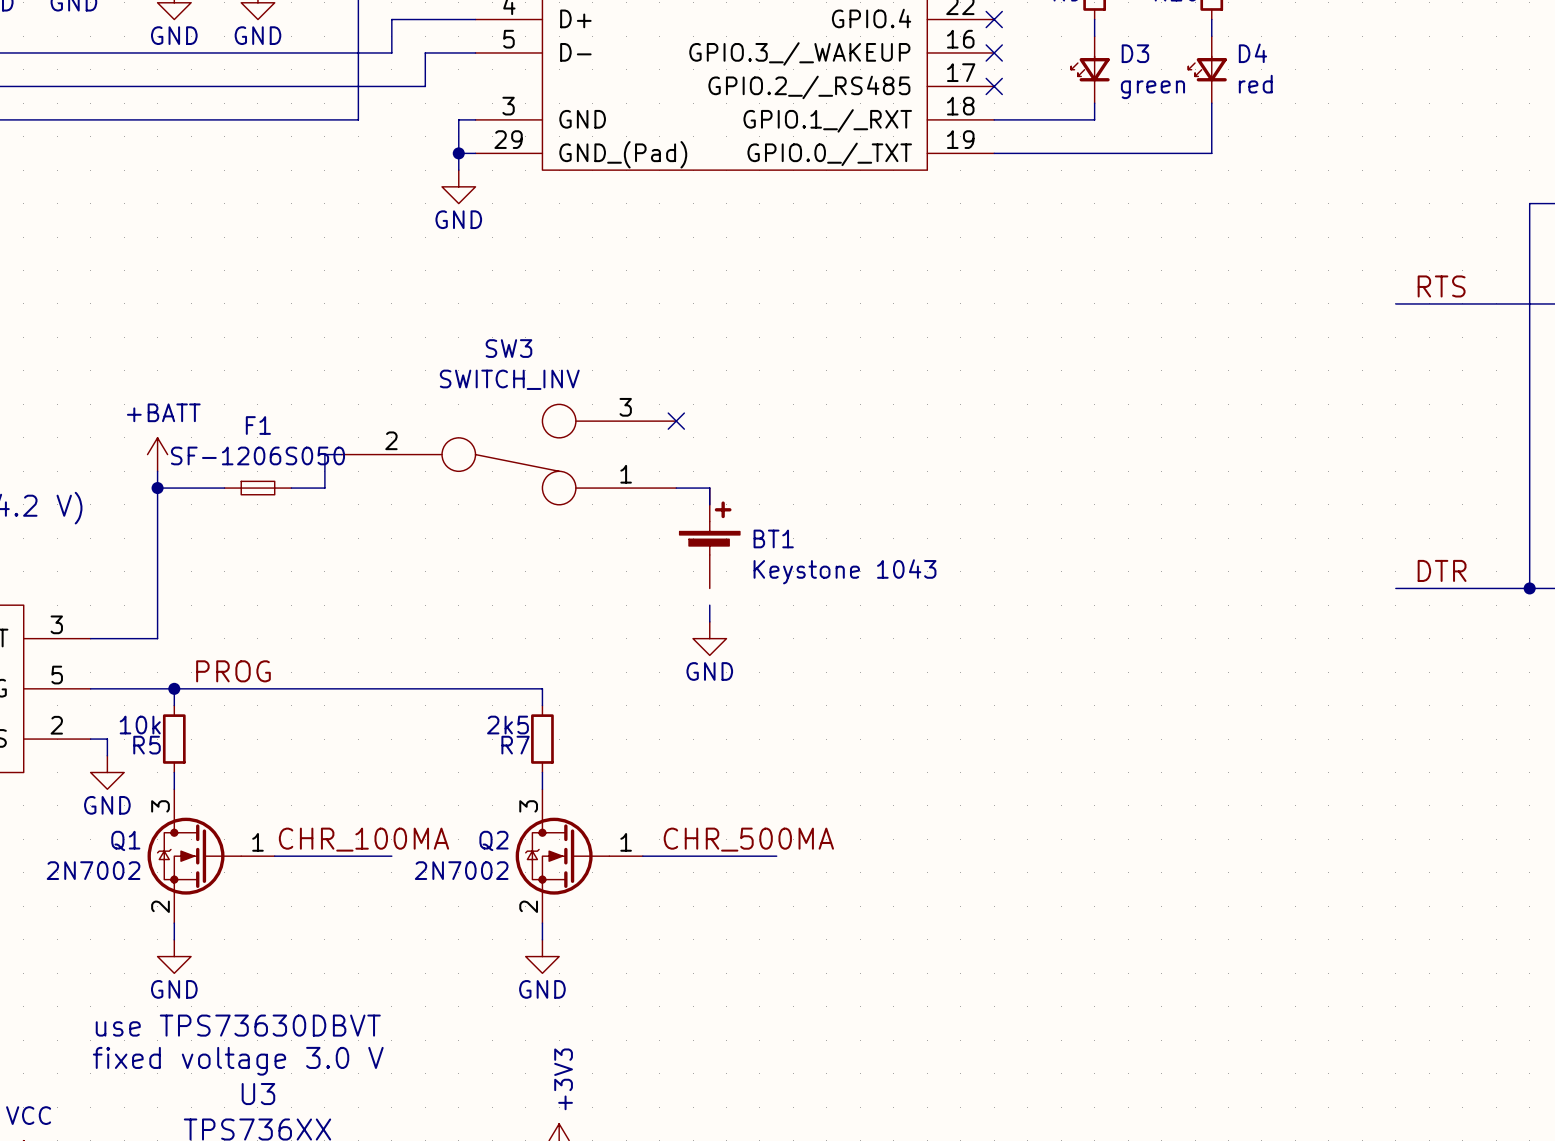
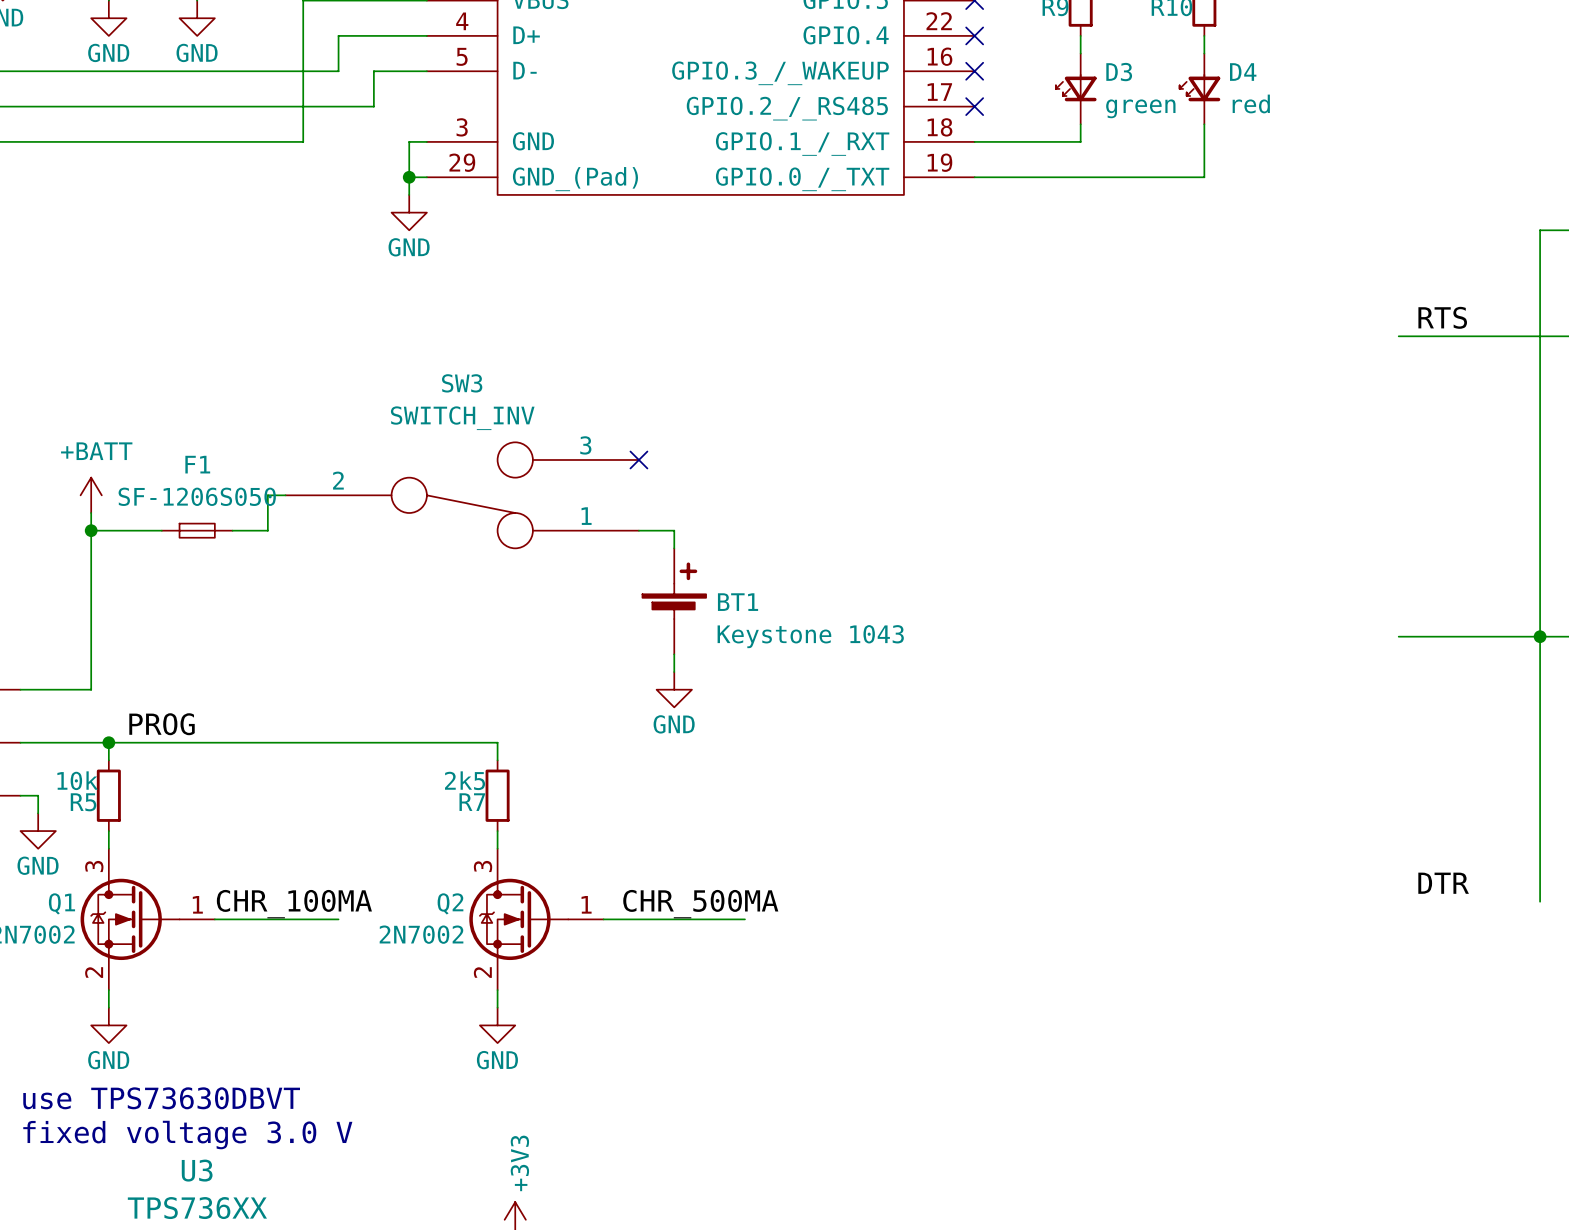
BT1 position: (709, 538) -> (674, 601)
label position: DTR (1442, 570) -> DTR (1443, 883)
wire: none -> (1540, 636) (1540, 901)

